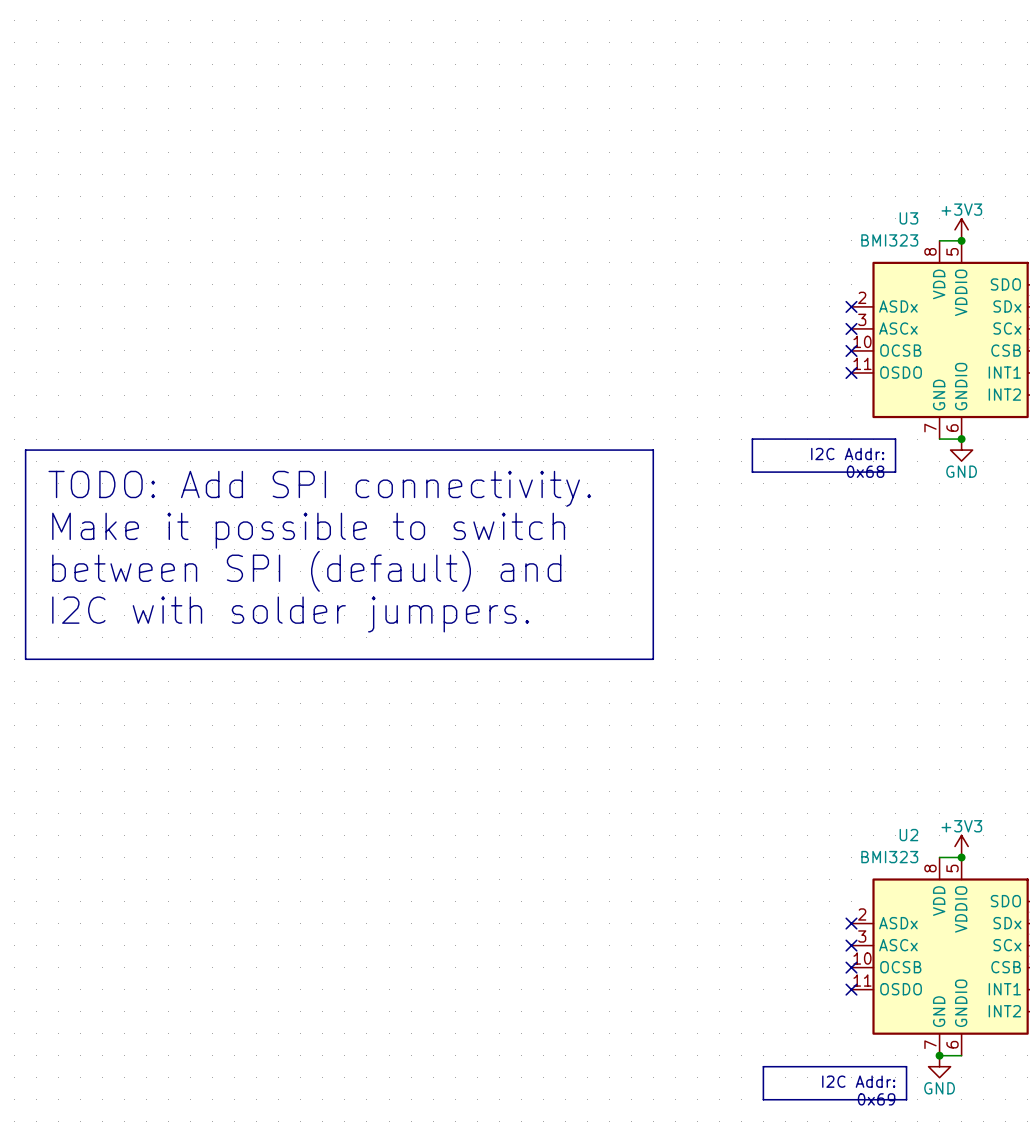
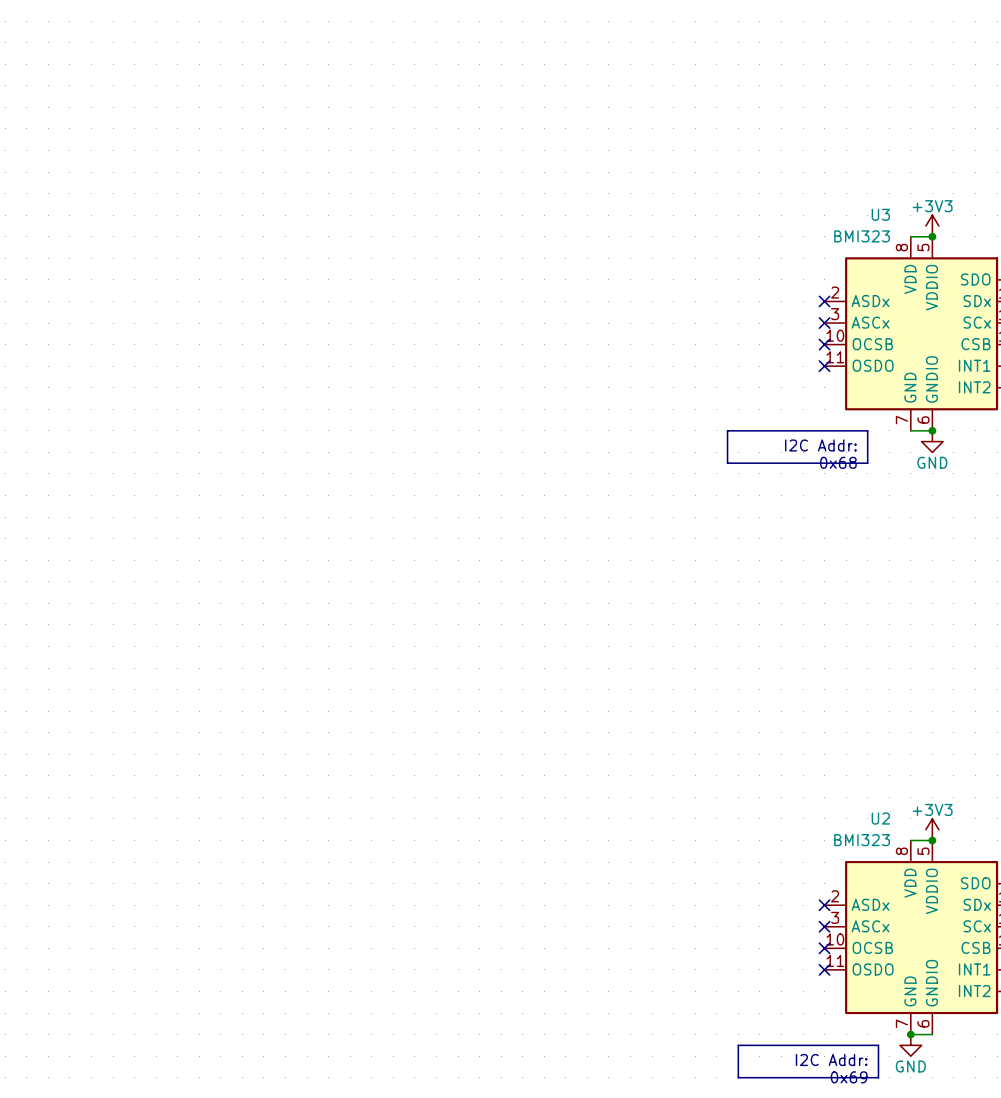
line: (25, 450) (653, 450) (653, 659) (25, 659) (25, 450) -> none
text: TODO: Add SPI connectivity. (319, 488) -> none
text: Make it possible to switch (308, 530) -> none
text: between SPI (default) and (306, 571) -> none
text: I2C with solder jumpers. (290, 614) -> none

